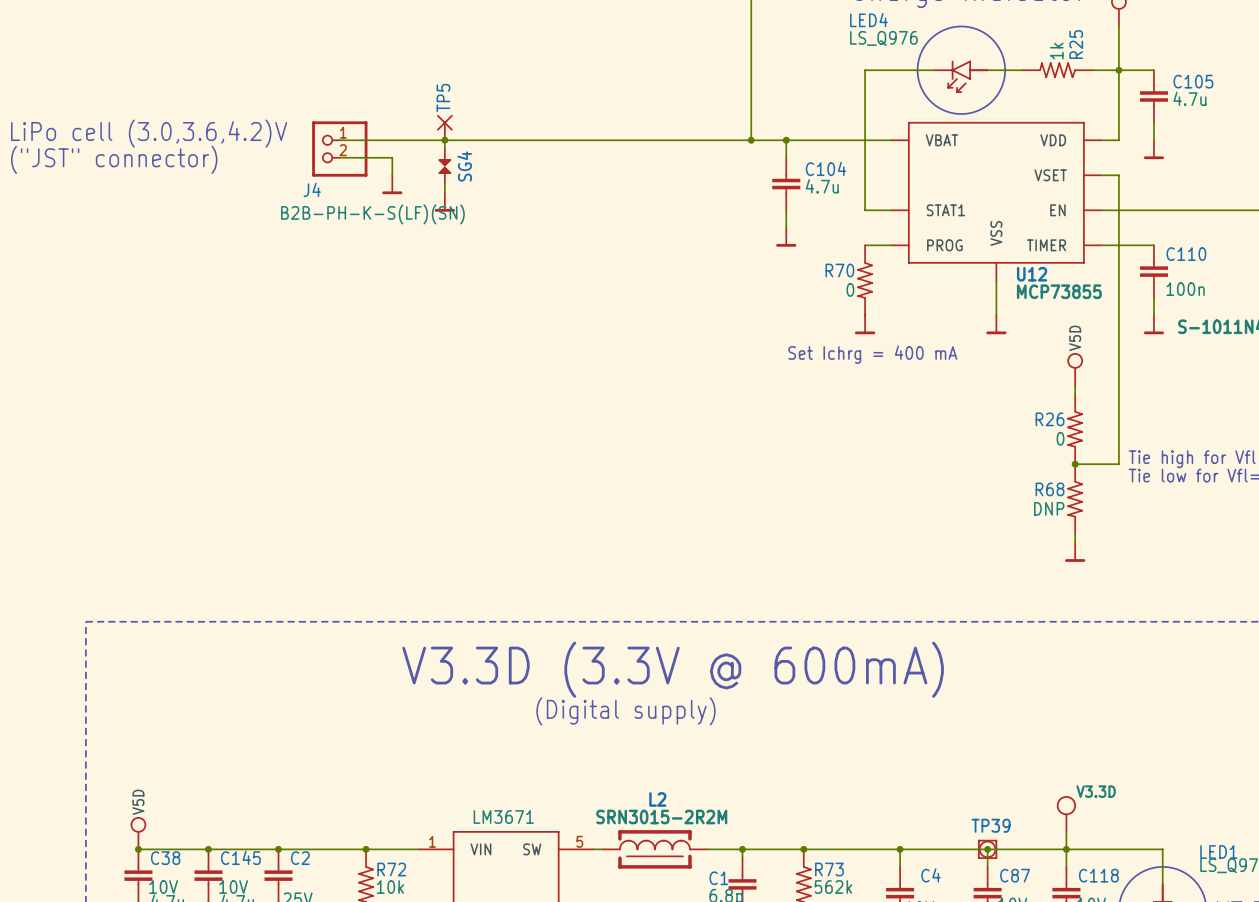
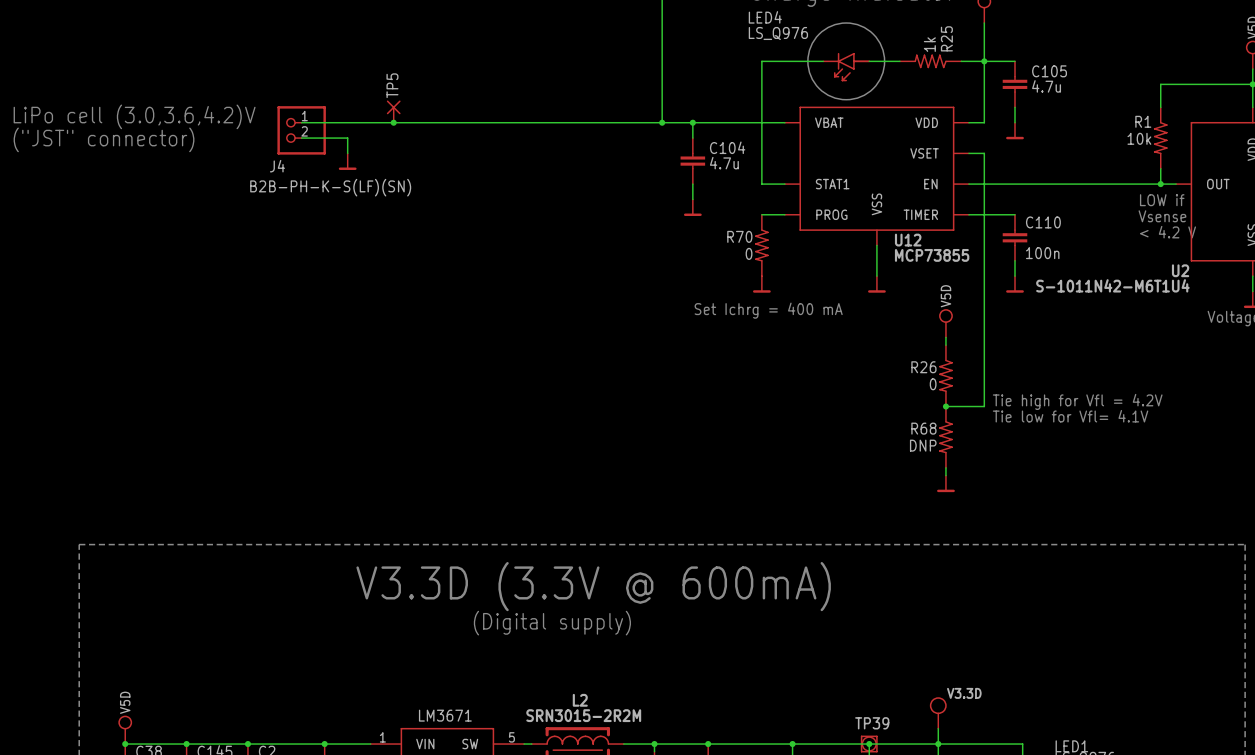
wire: (444, 140) (444, 149) -> none
SG4: (444, 166) -> none
wire: (444, 184) (444, 192) -> none
power symbol: (444, 202) -> none

